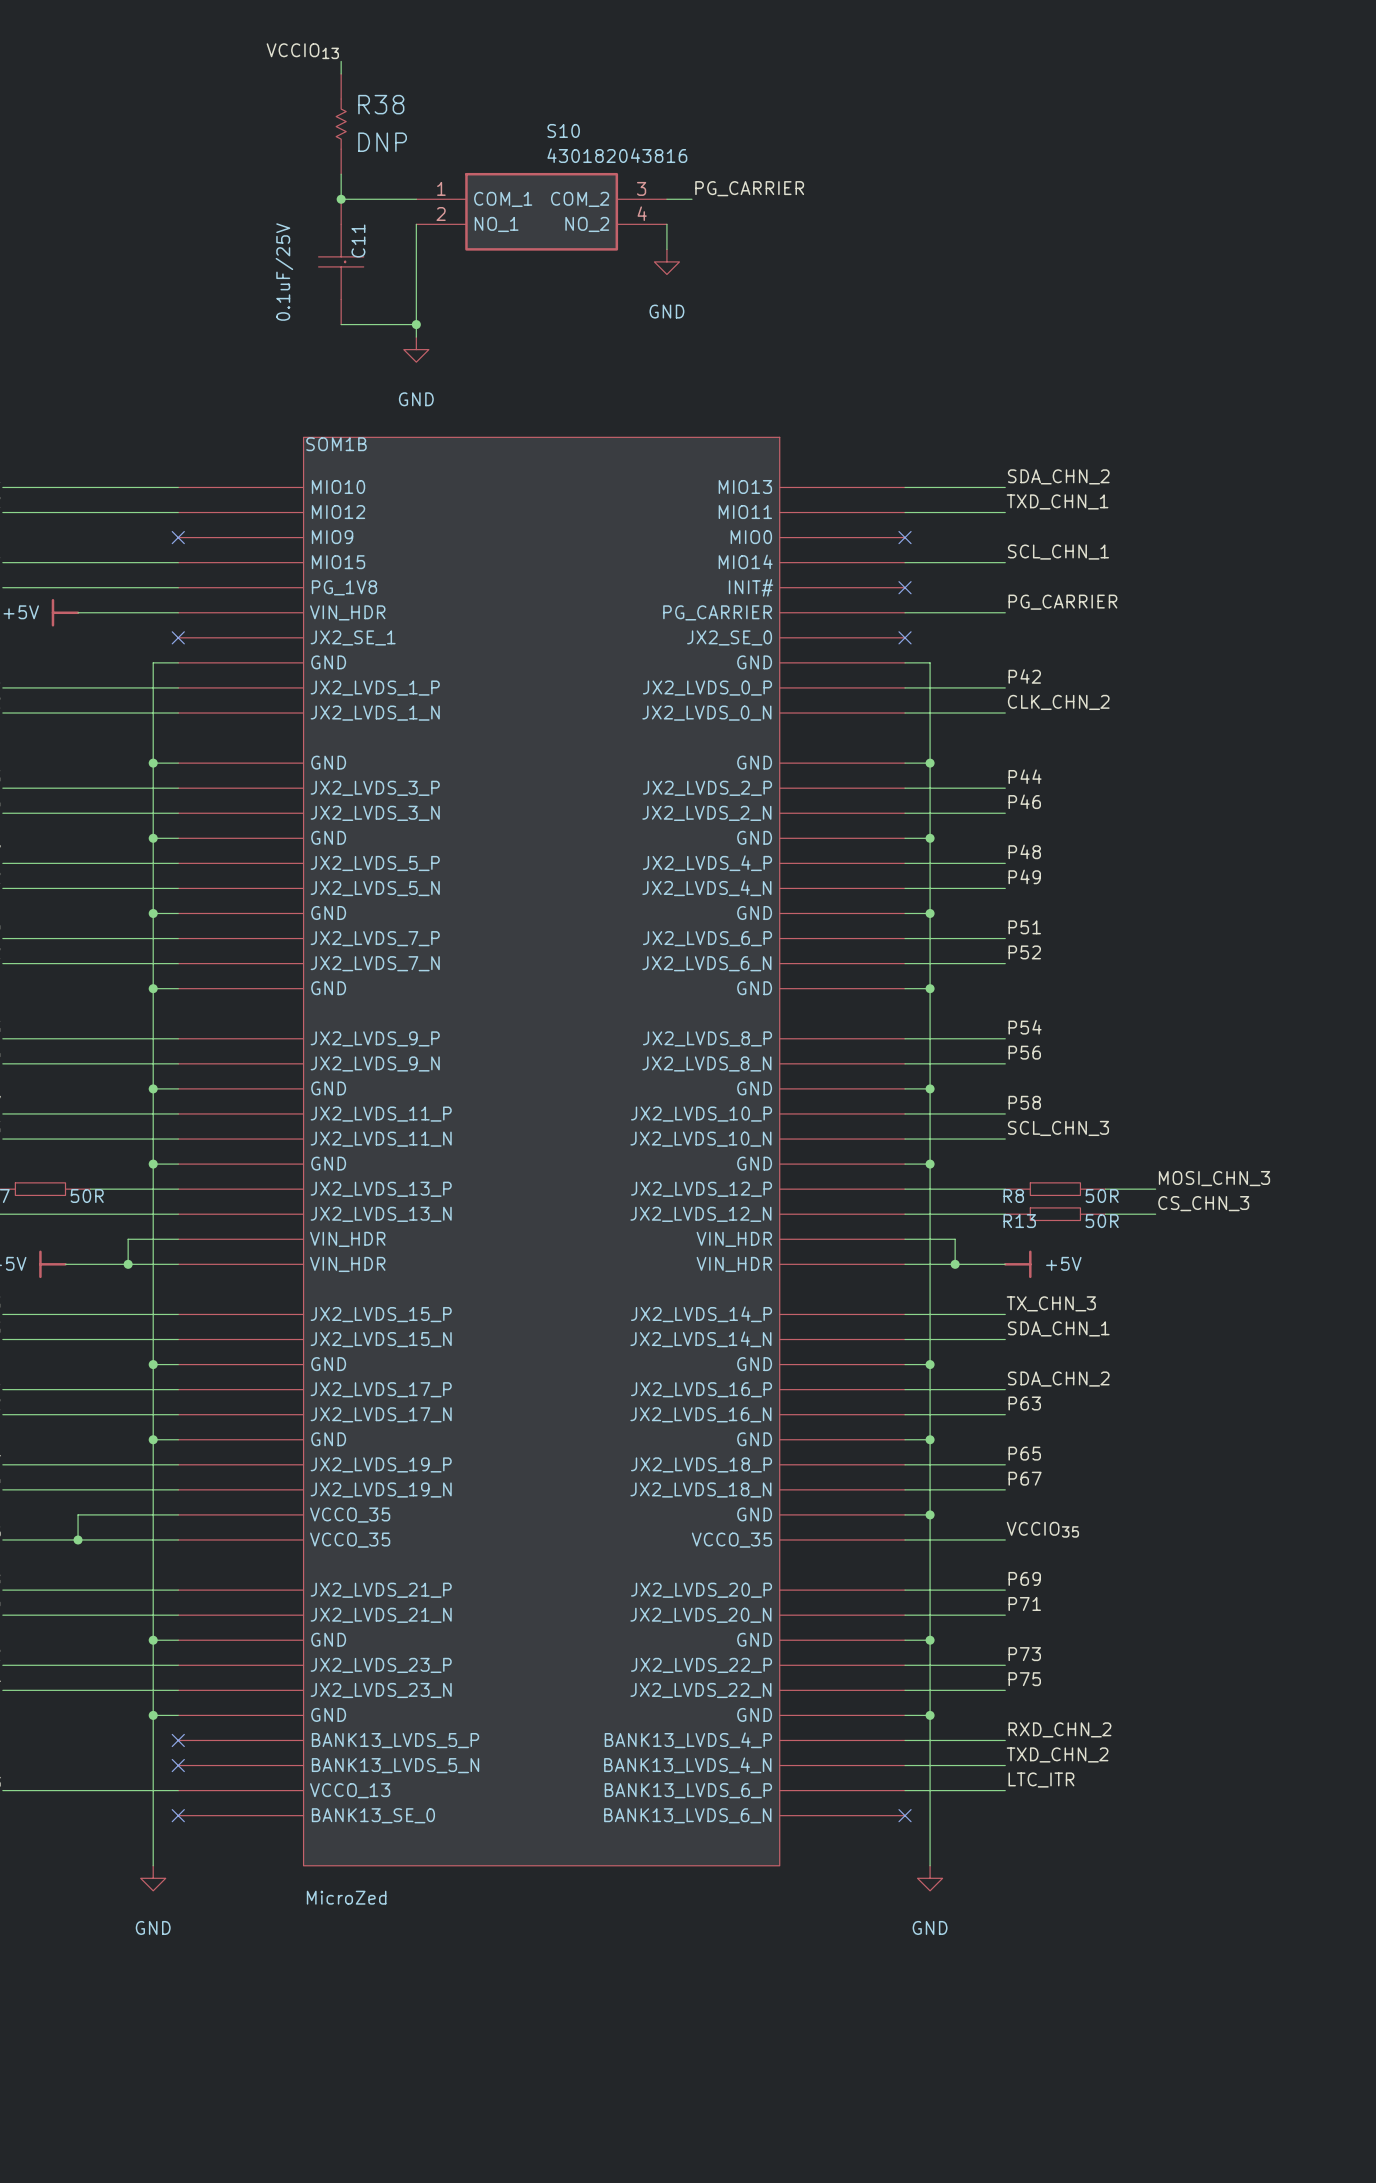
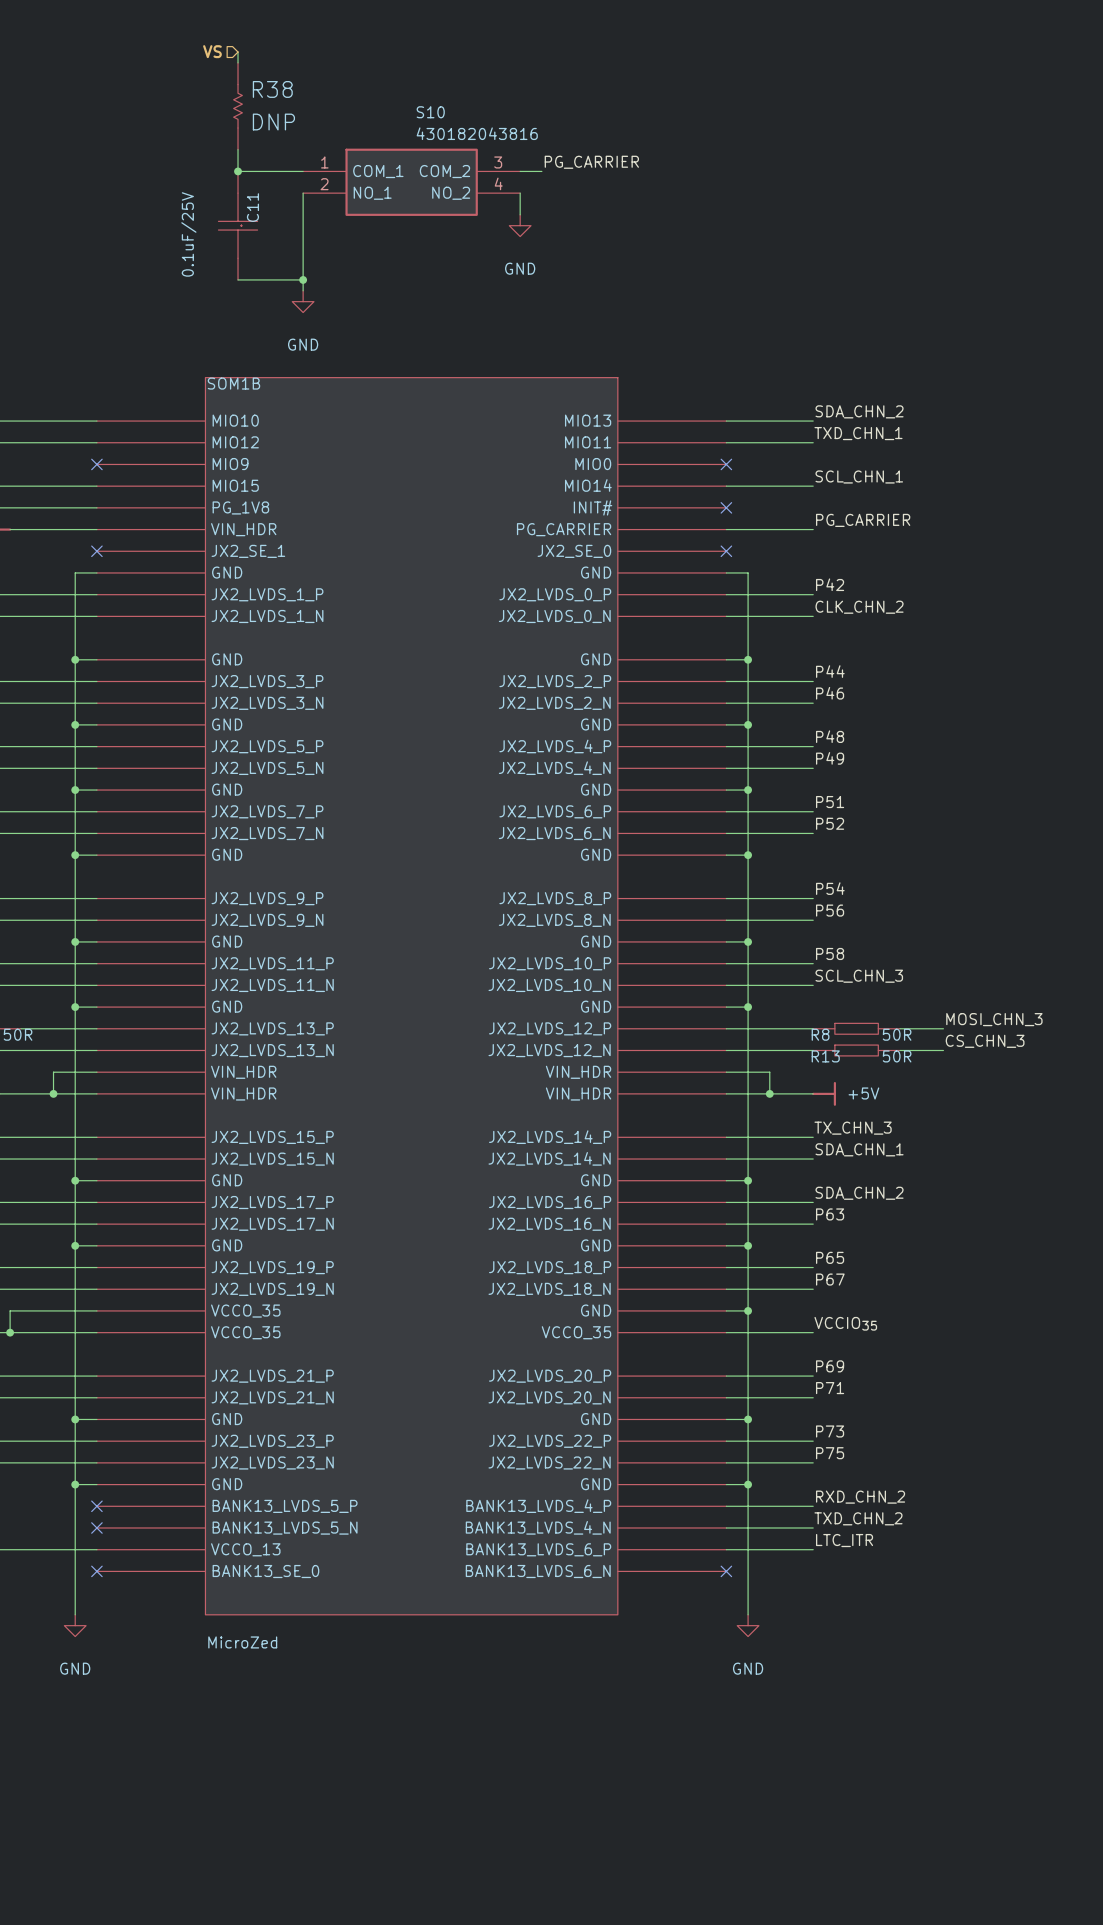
label: VCCIO13 (302, 51) -> none
hierarchical label: none -> VS (212, 51)

